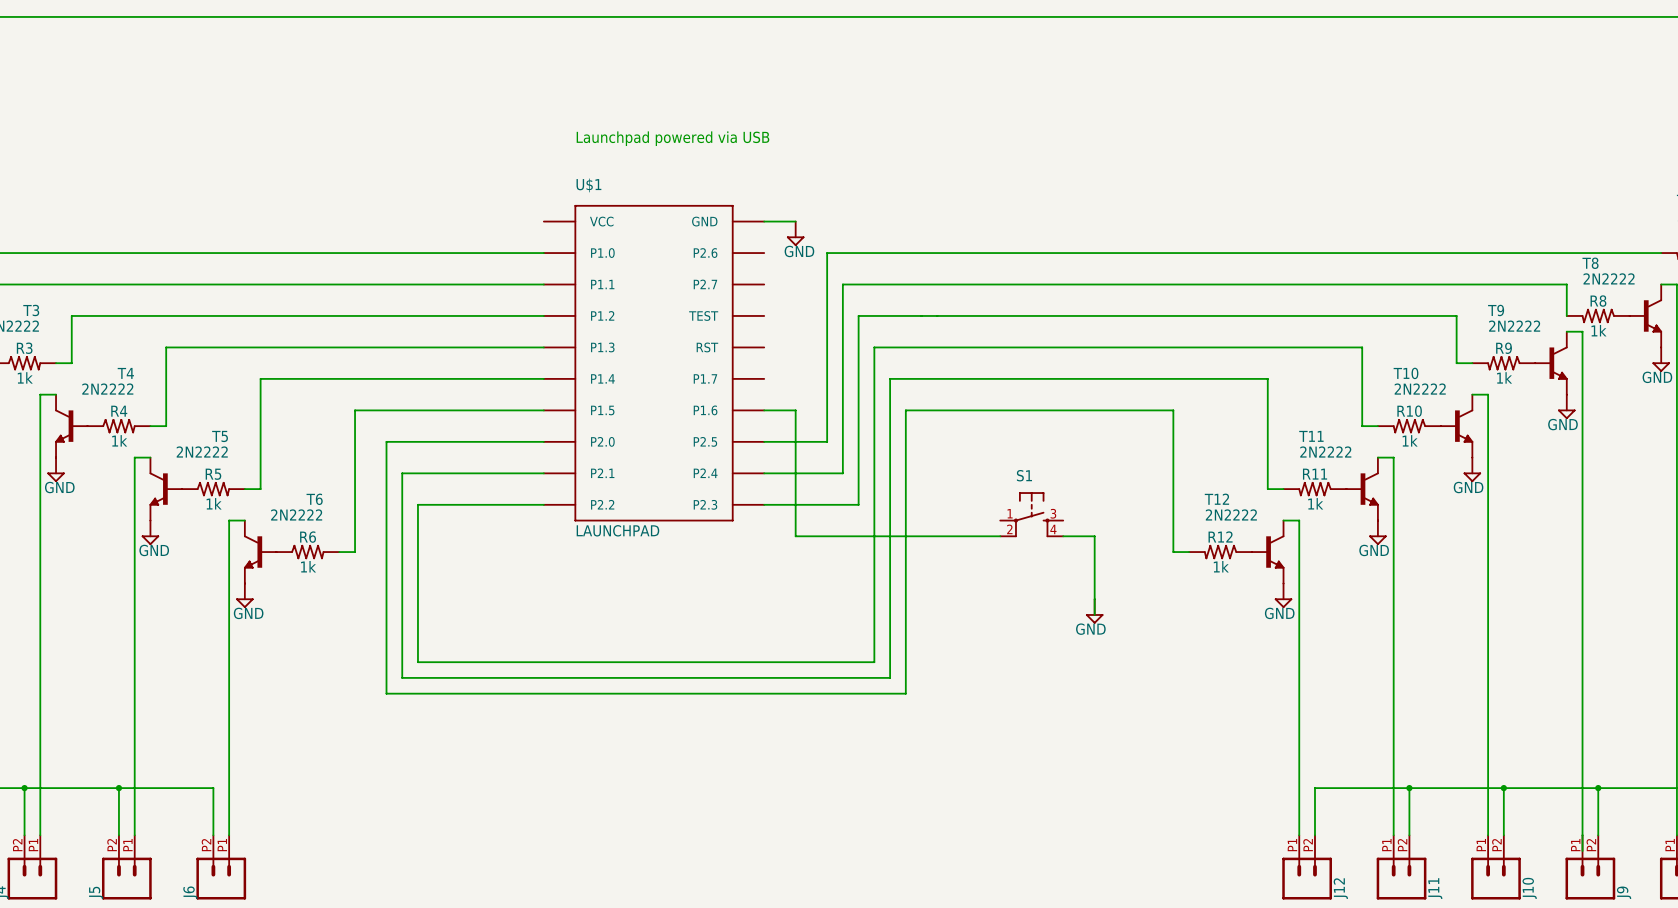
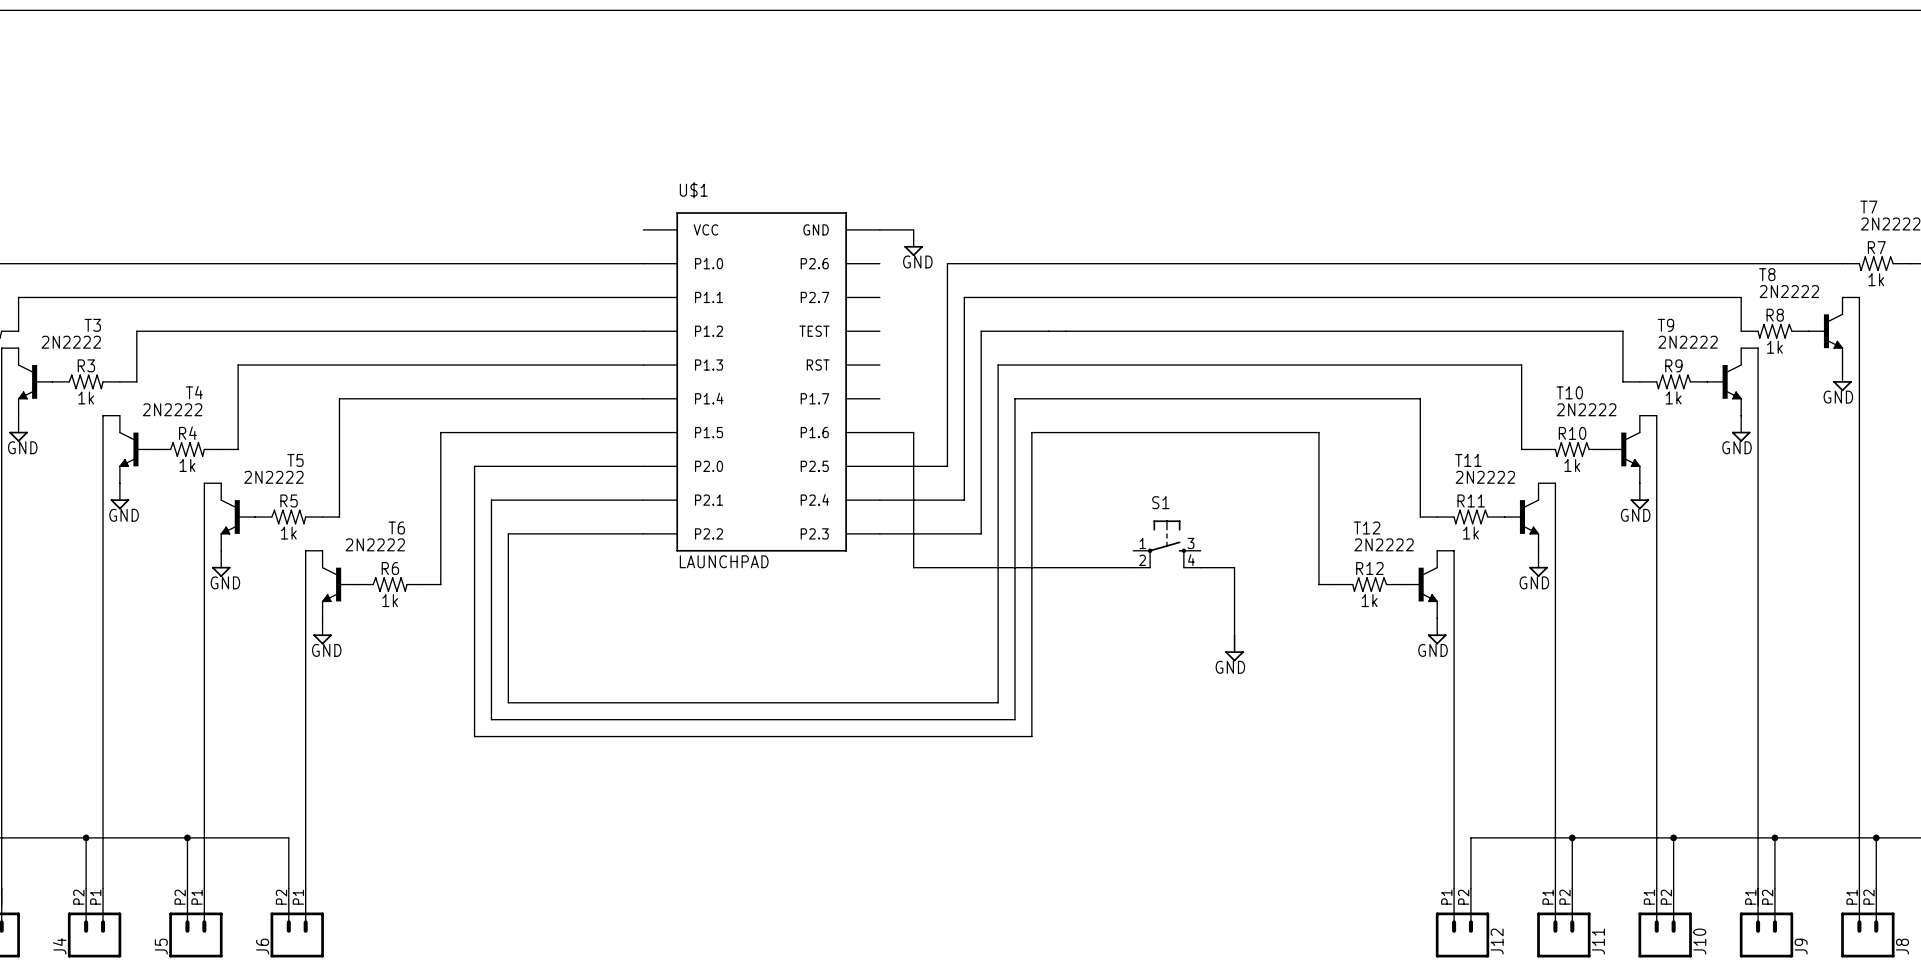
text: Launchpad powered via USB (672, 138) -> none

